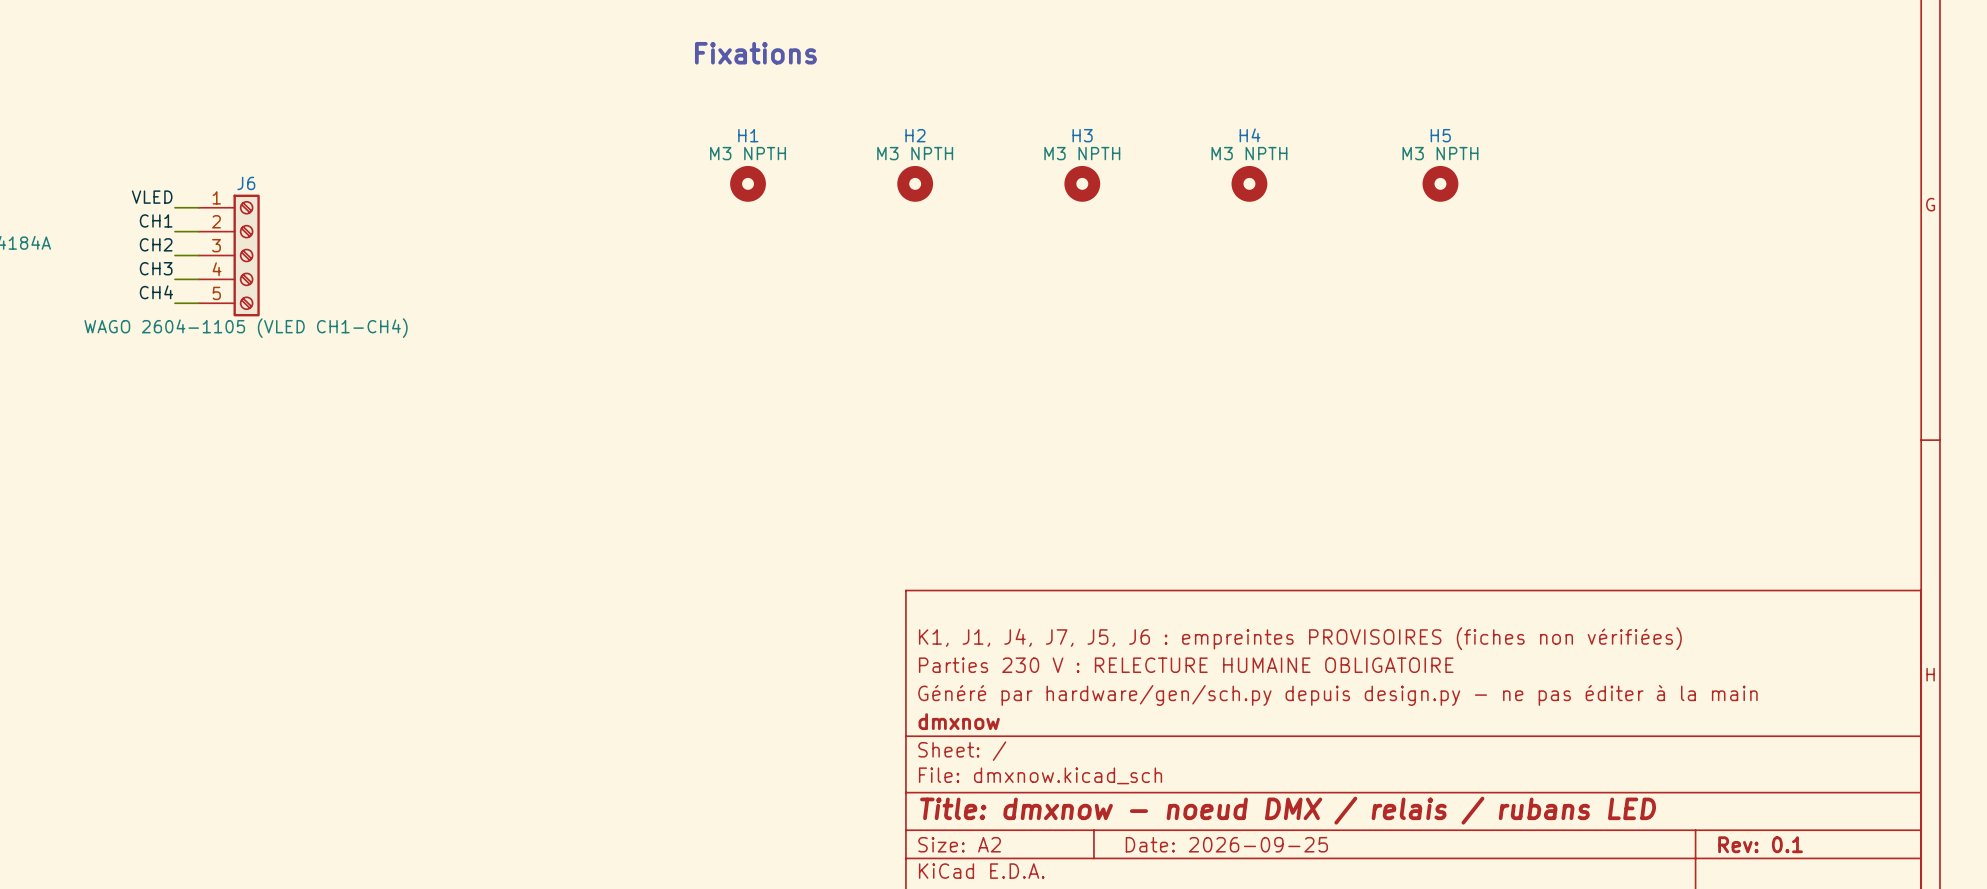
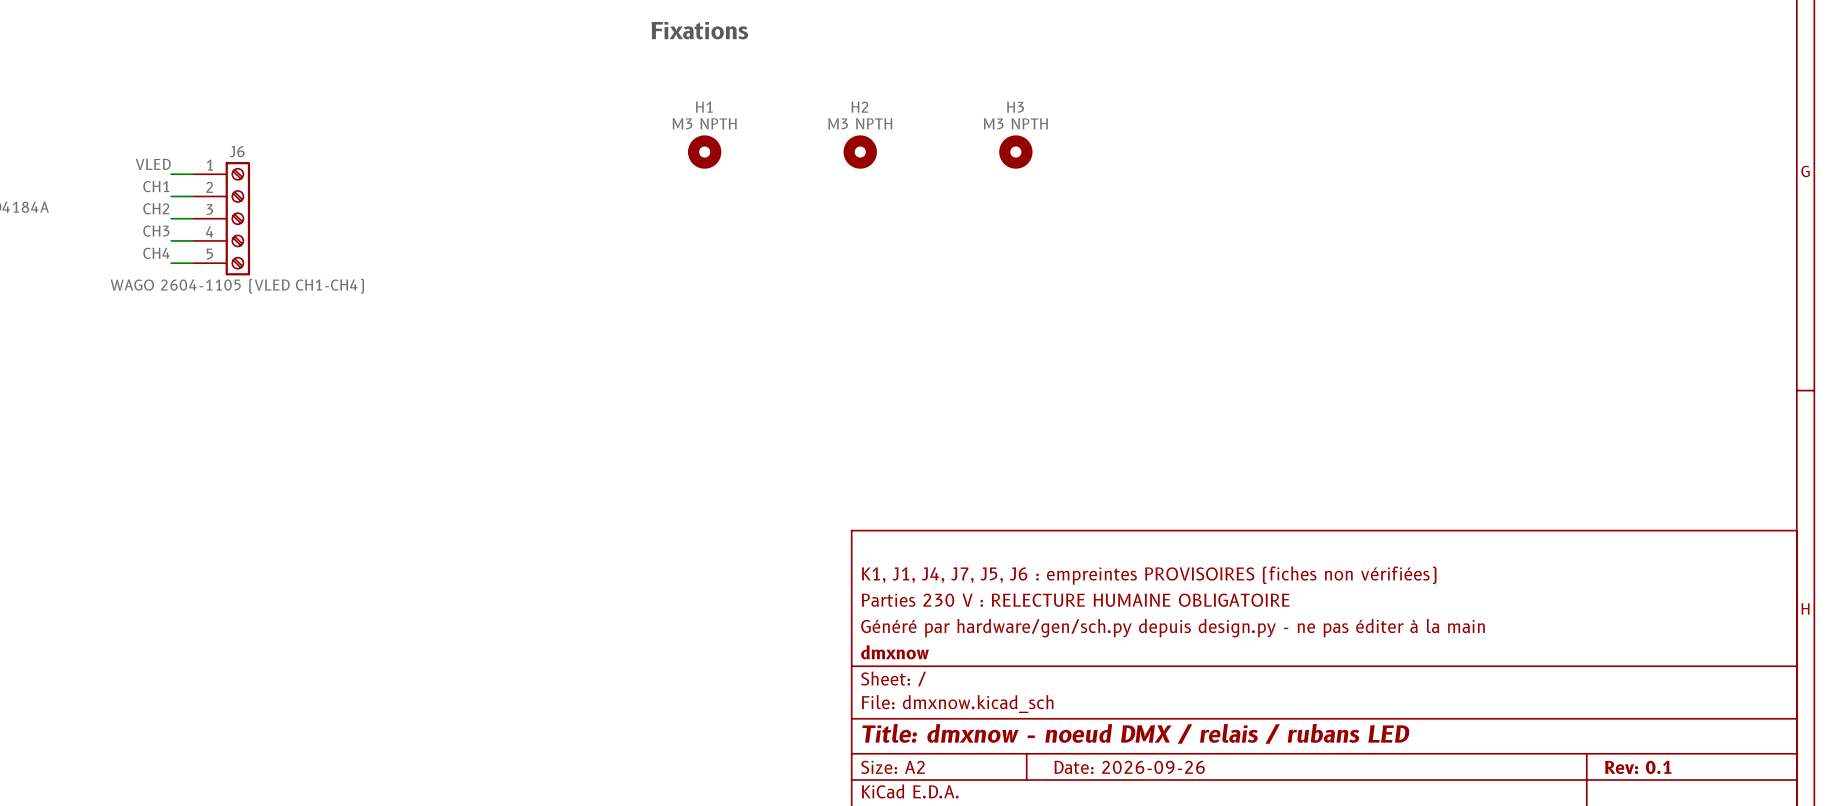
H4: M3 NPTH (1249, 183) -> none
H5: M3 NPTH (1440, 183) -> none
title block: Date: 2026-09-25 (1226, 844) -> Date: 2026-09-26 (1129, 767)

